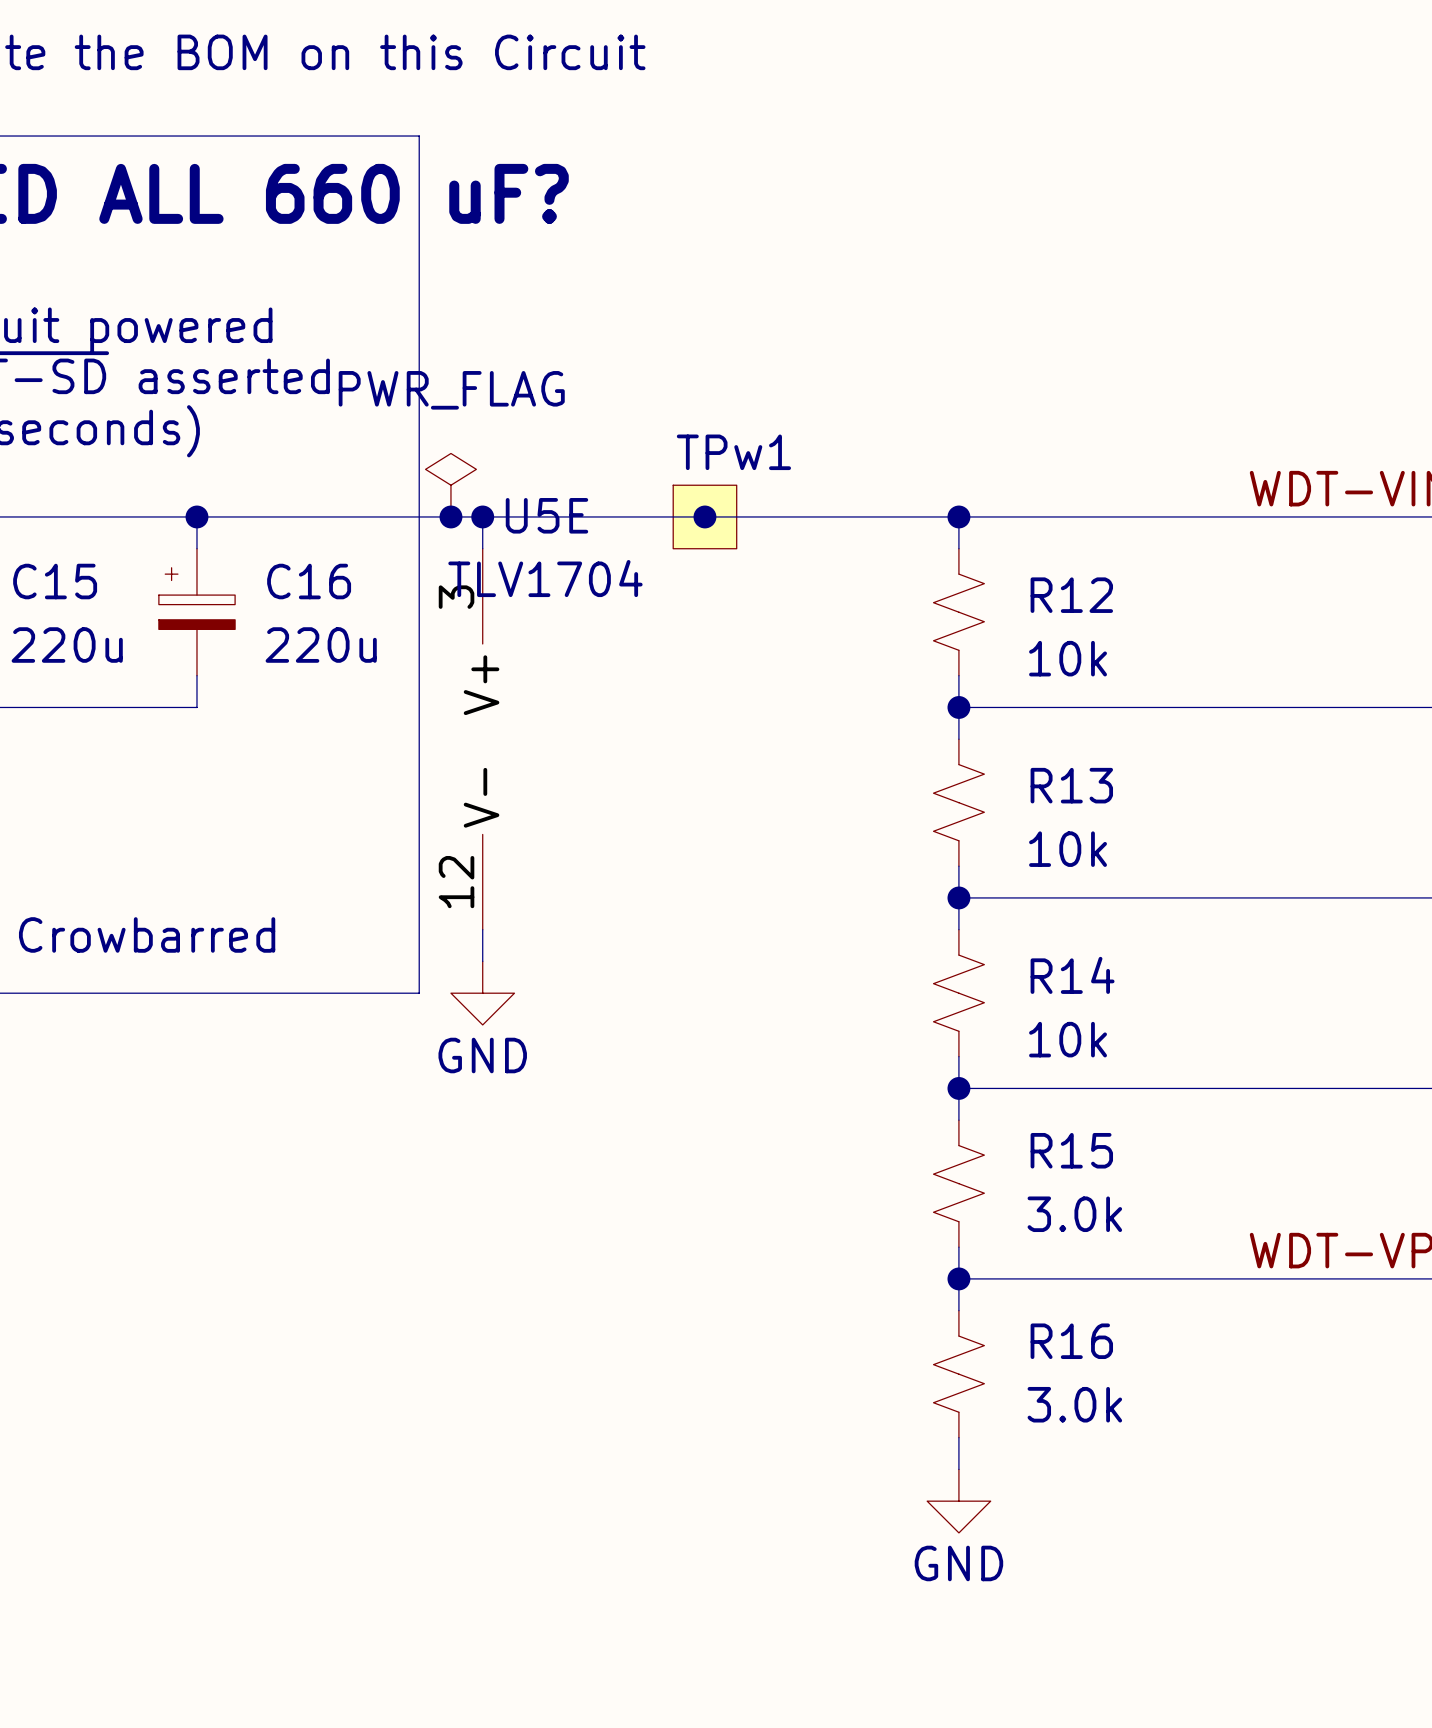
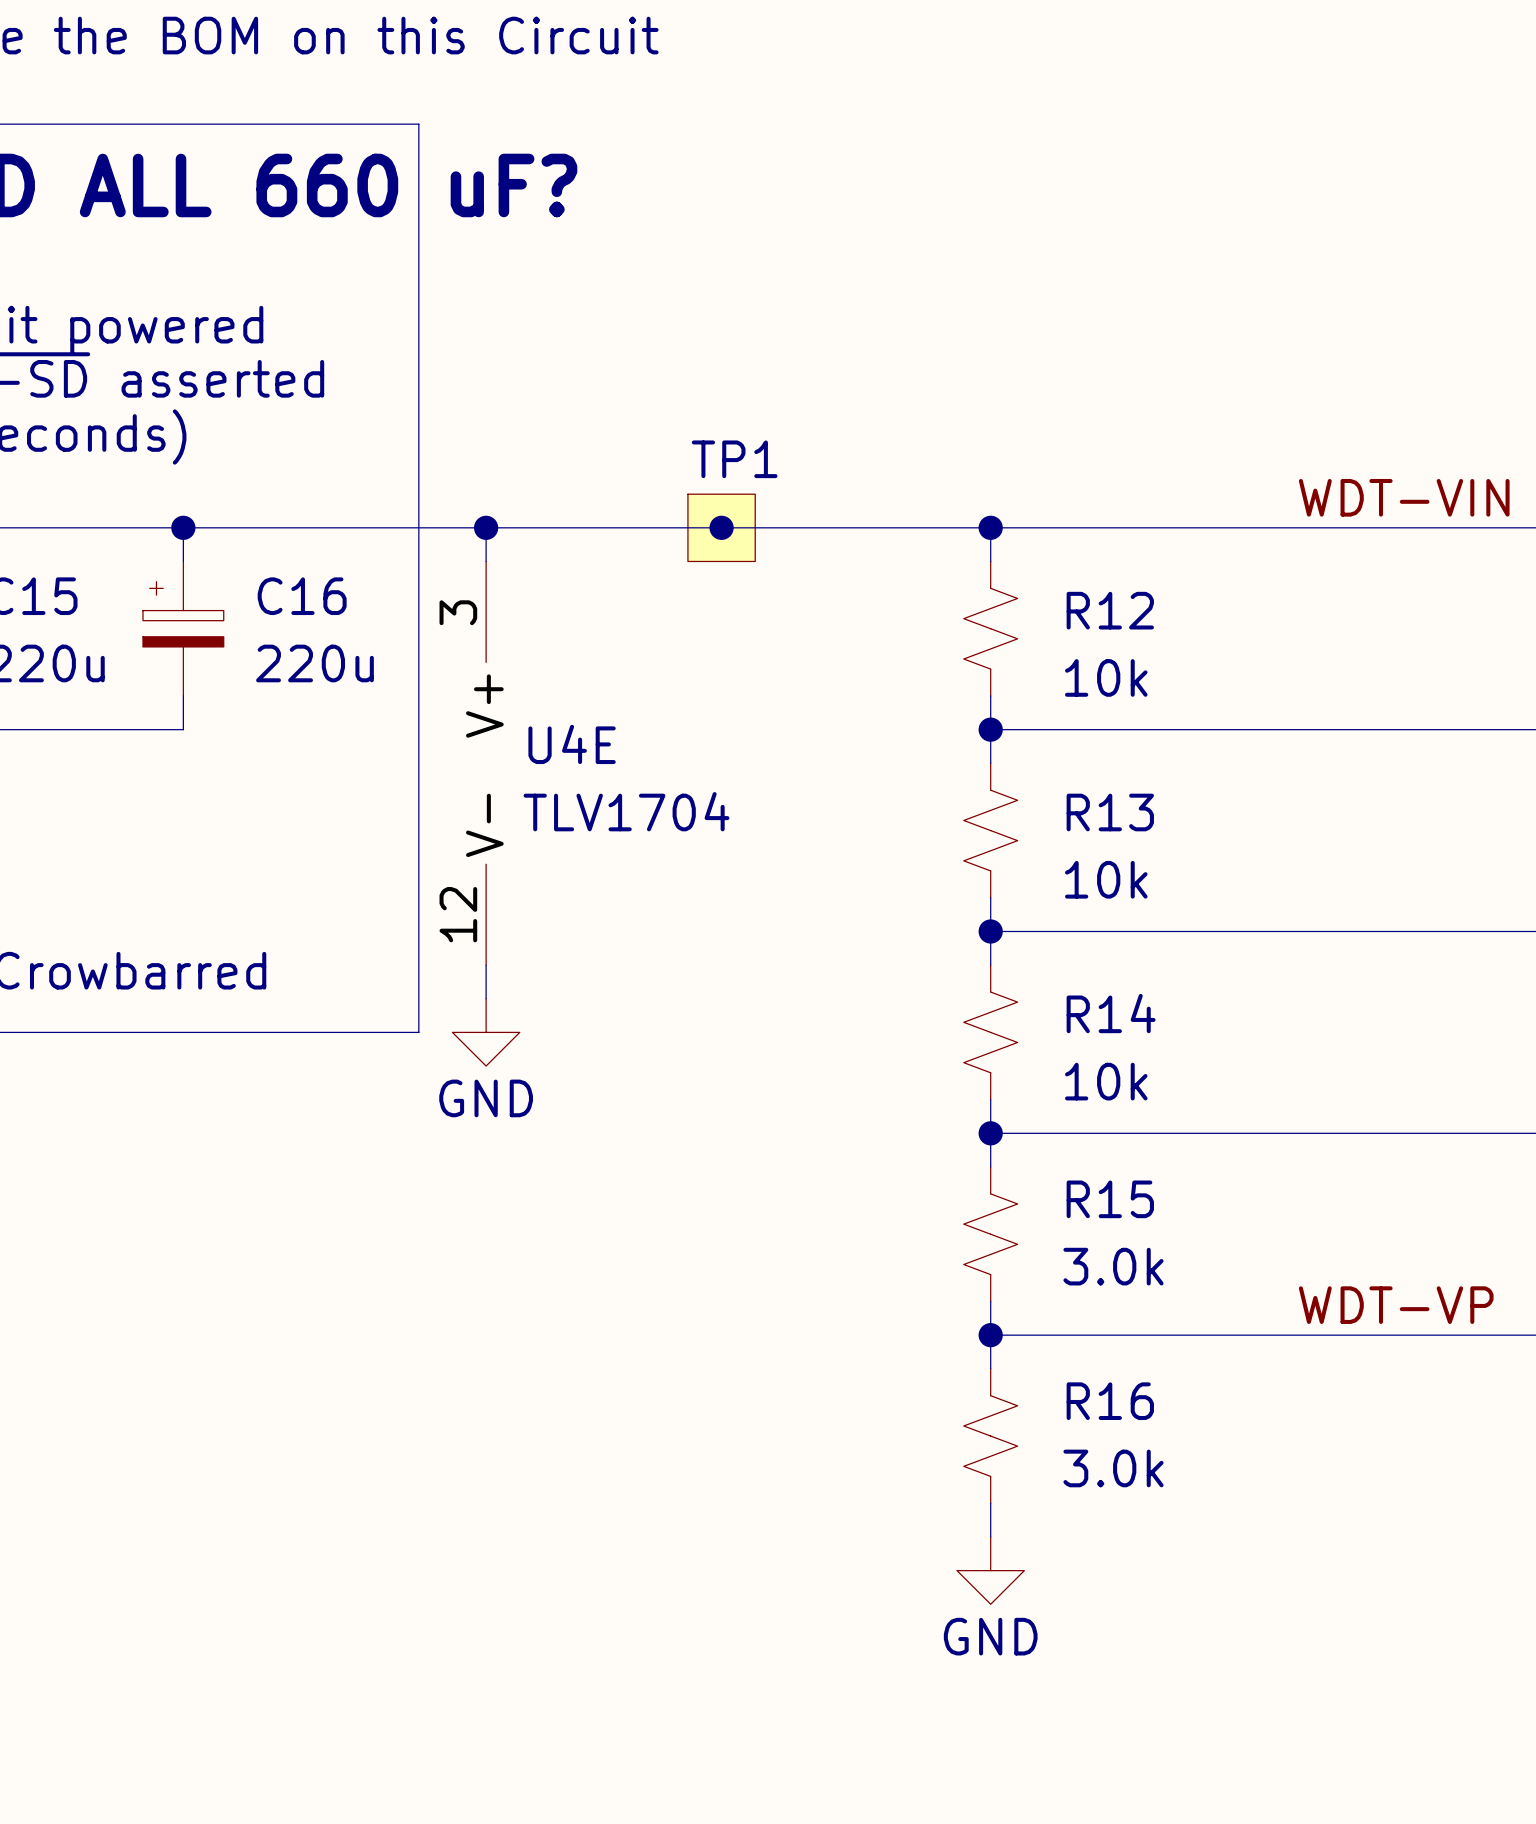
TPw1 name: TPw1 (733, 452) -> TP1 (734, 459)
power symbol: PWR_FLAG (450, 485) -> none
U5E name: U5E (546, 515) -> U4E (572, 744)
junction: (450, 516) -> none
U5E value position: TLV1704 (545, 578) -> TLV1704 (626, 811)

